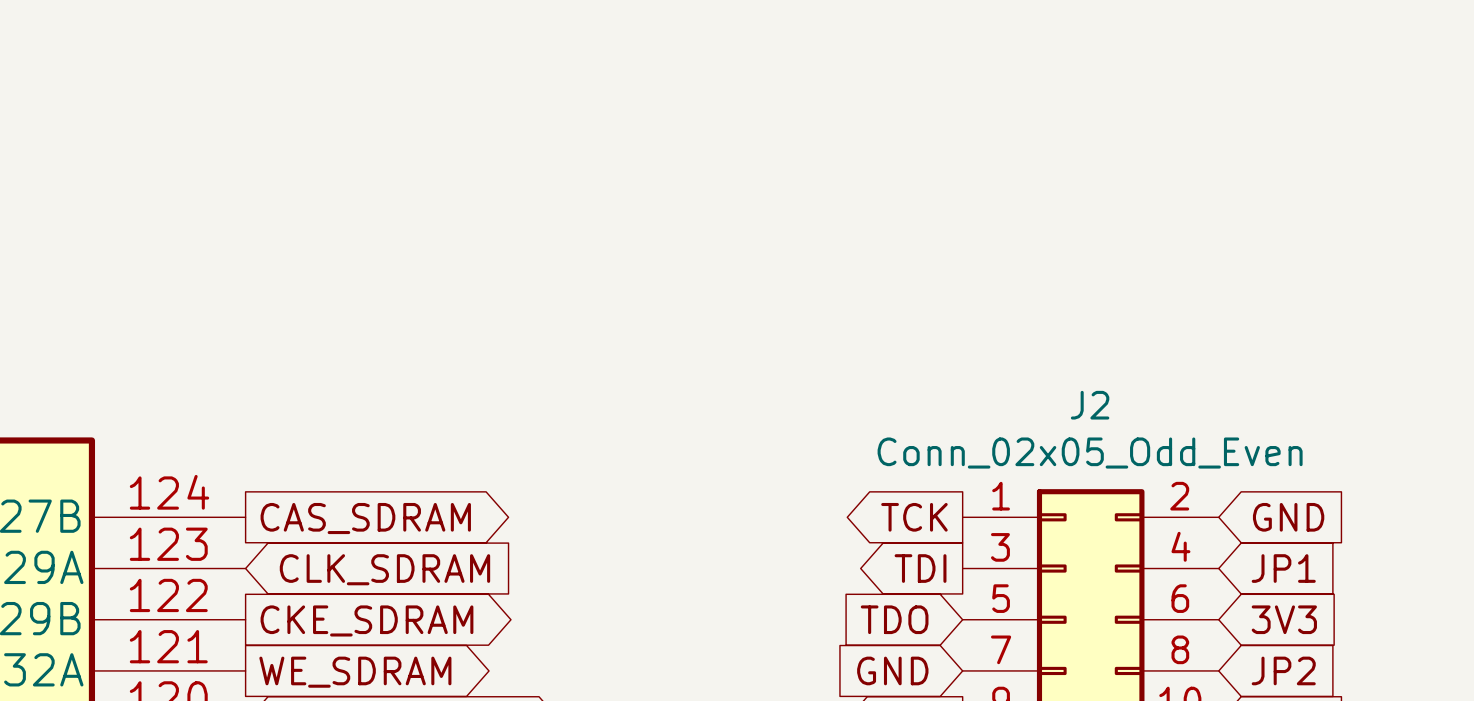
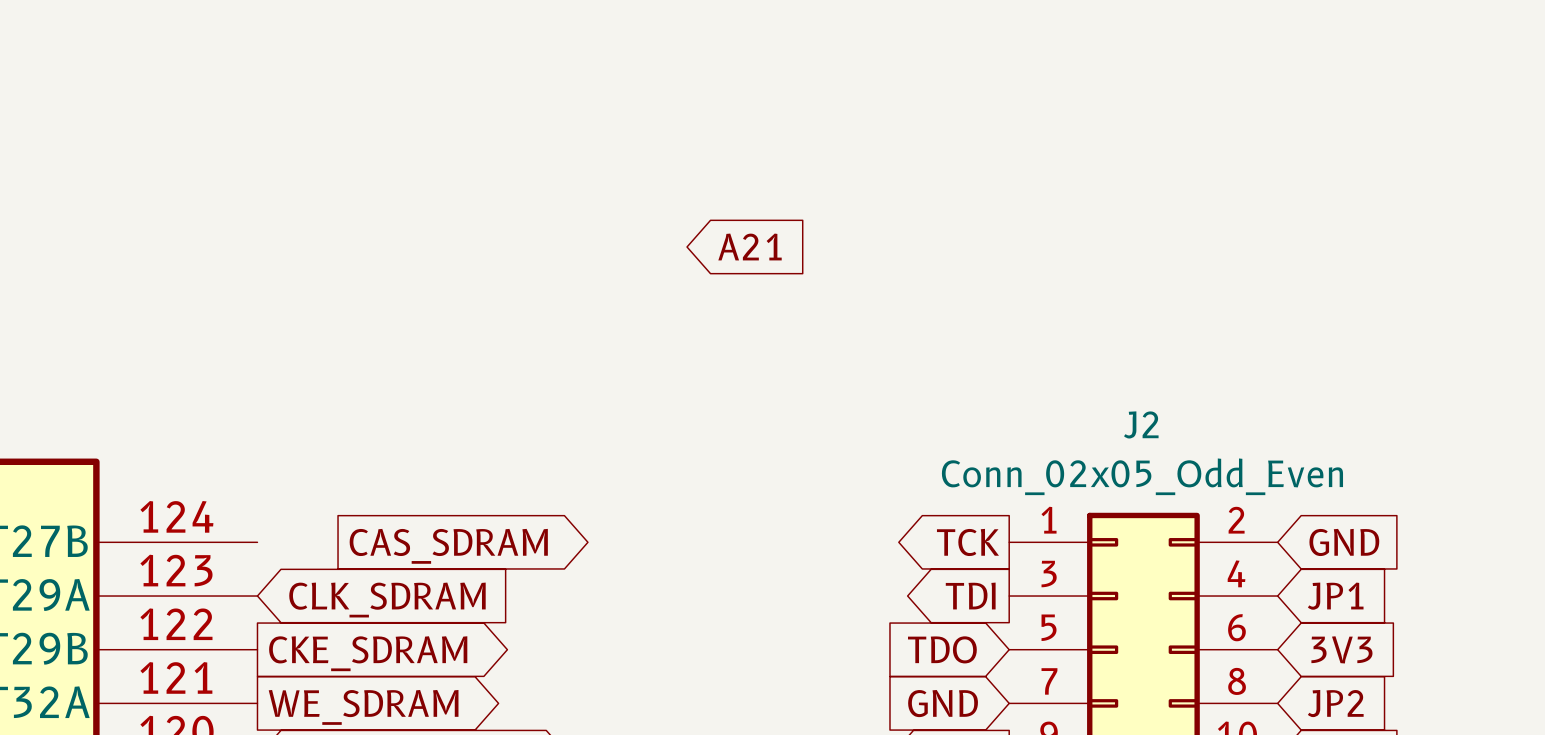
global label: none -> A21 (750, 246)
global label position: CAS_SDRAM (365, 518) -> CAS_SDRAM (448, 546)

